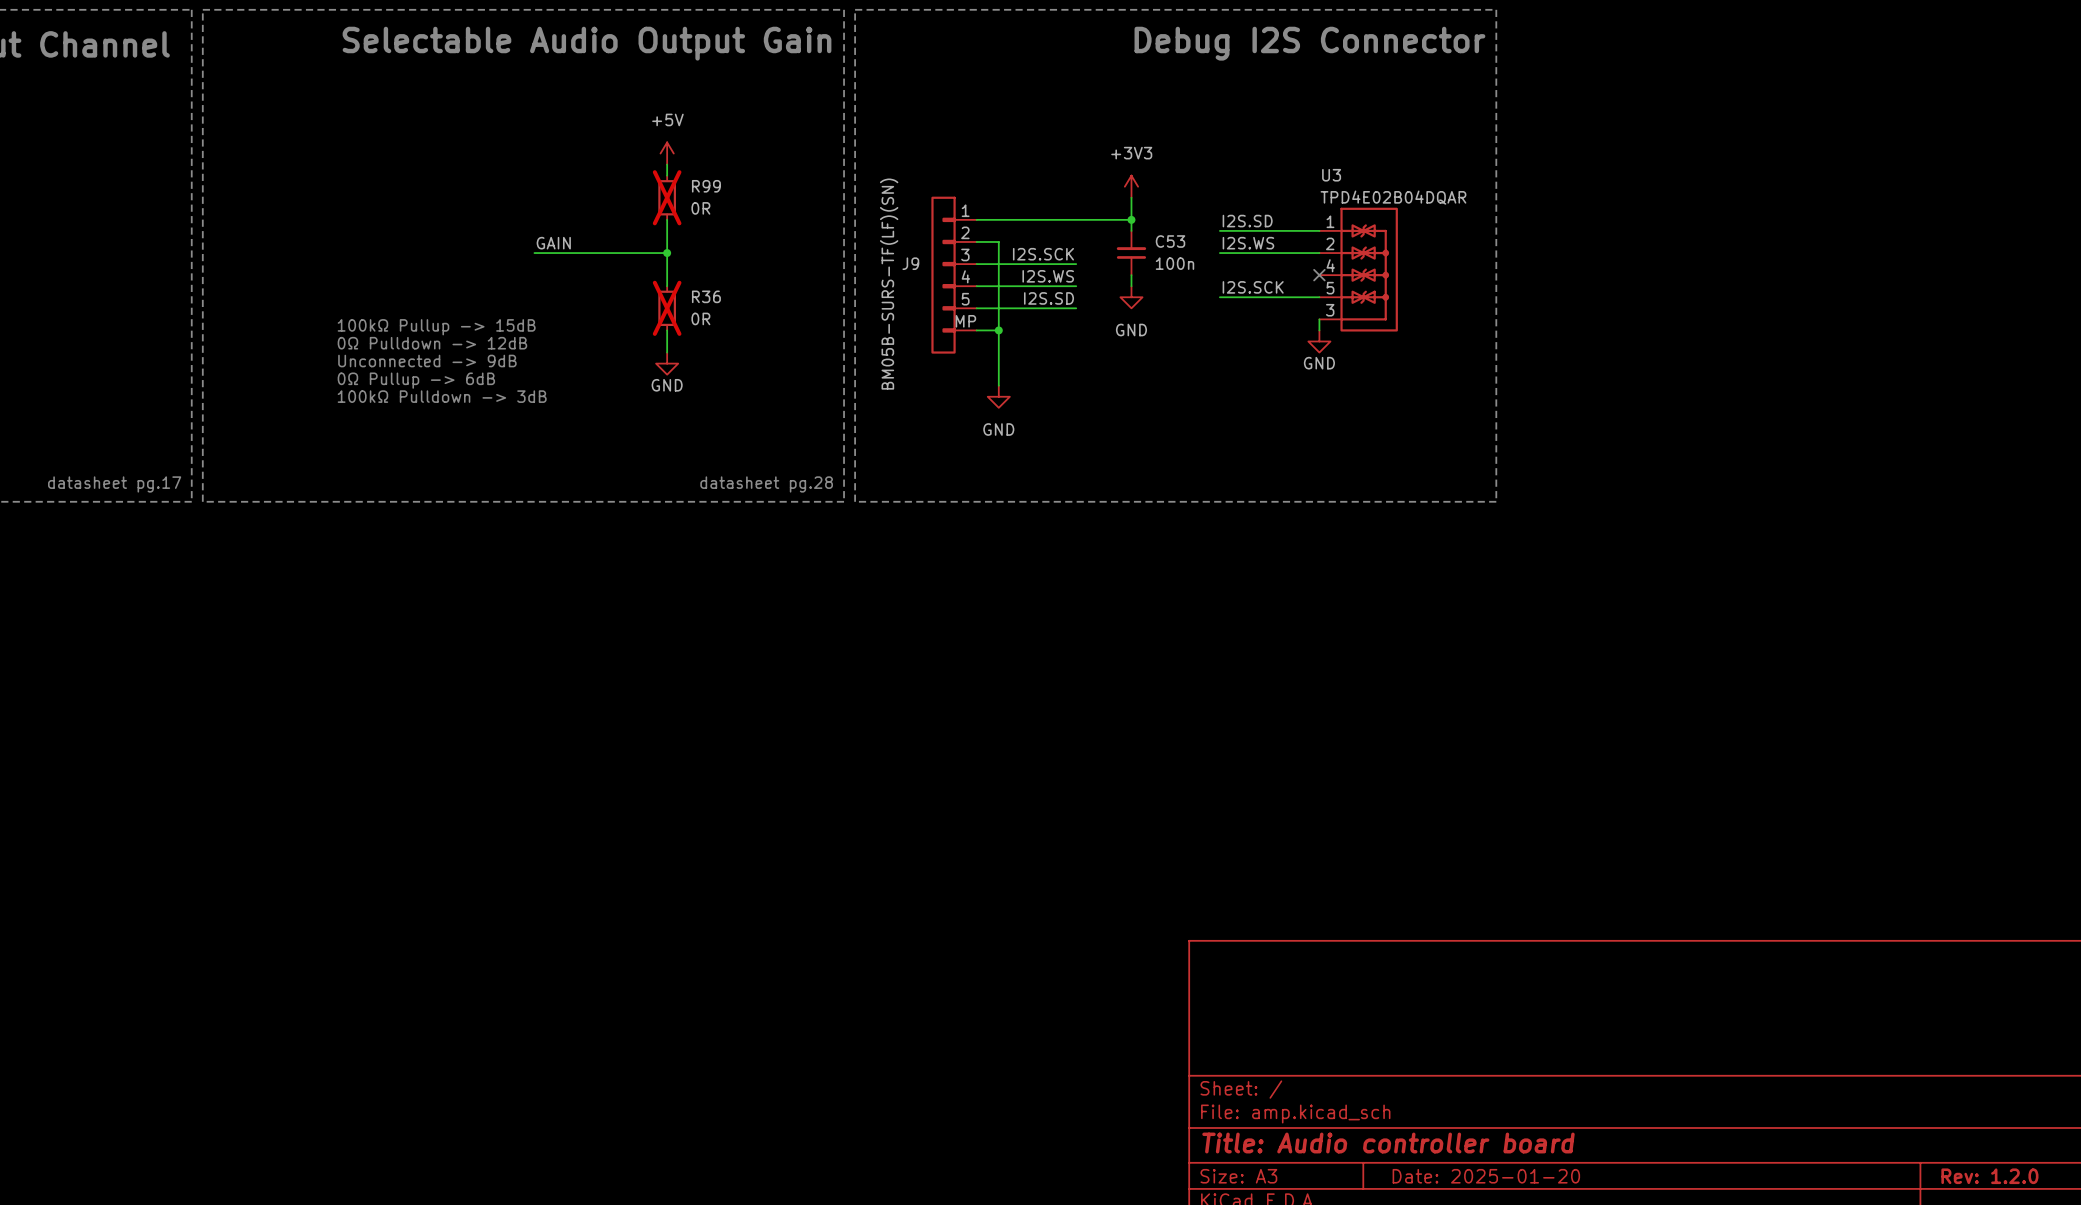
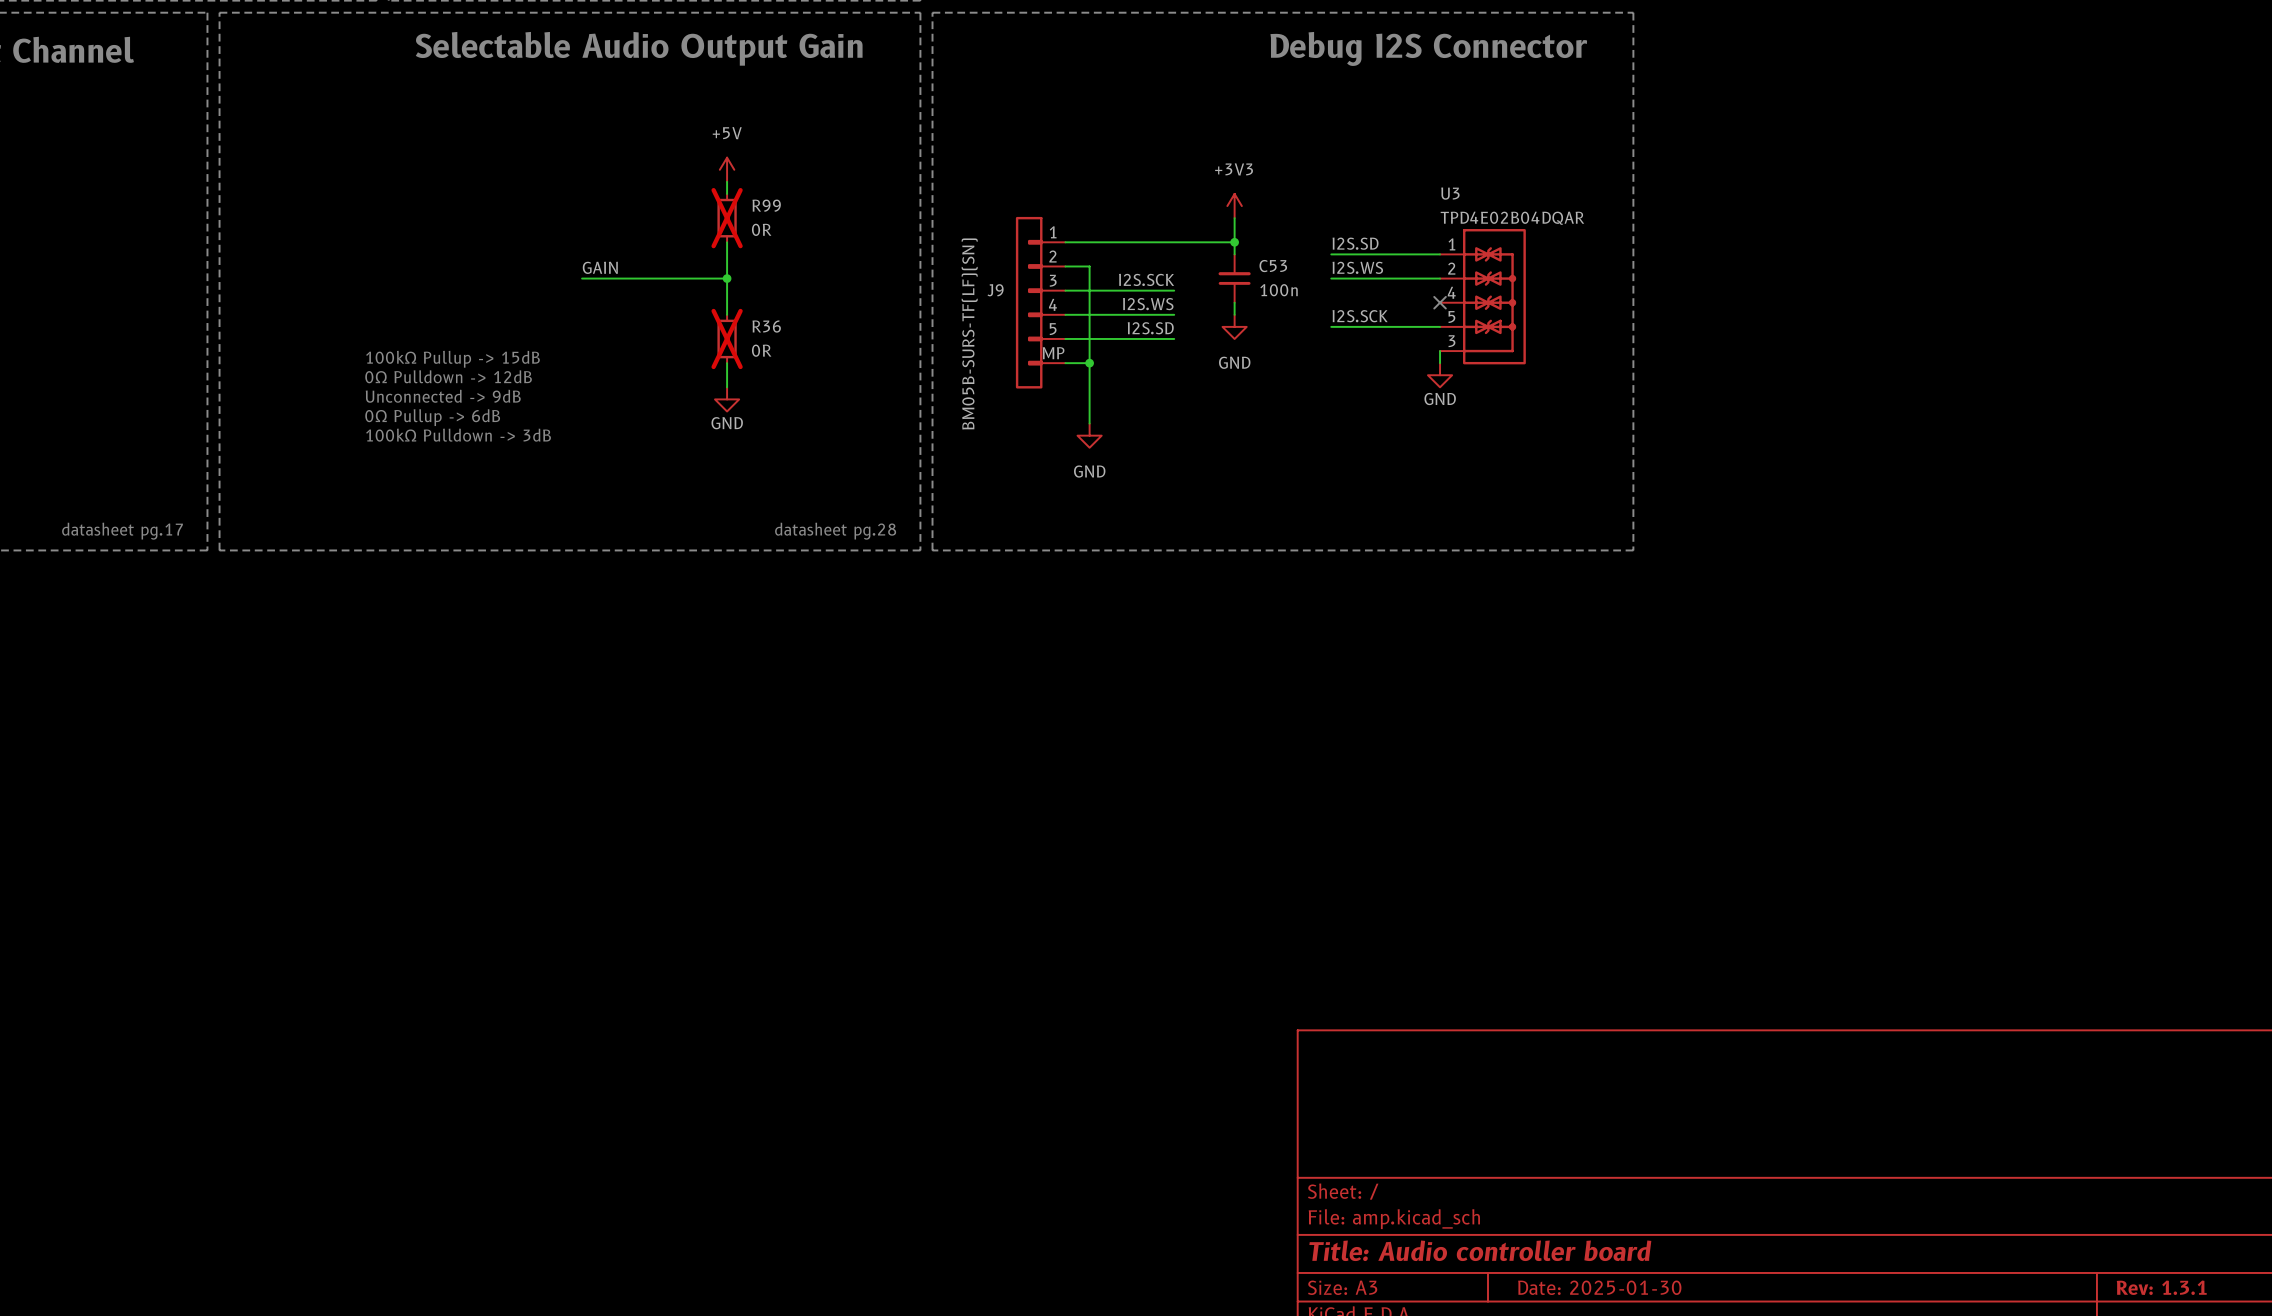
title block: Date: 2025-01-20 (1486, 1176) -> Date: 2025-01-30 (1599, 1287)
title block: Rev: 1.2.0 (1989, 1176) -> Rev: 1.3.1 (2161, 1287)

